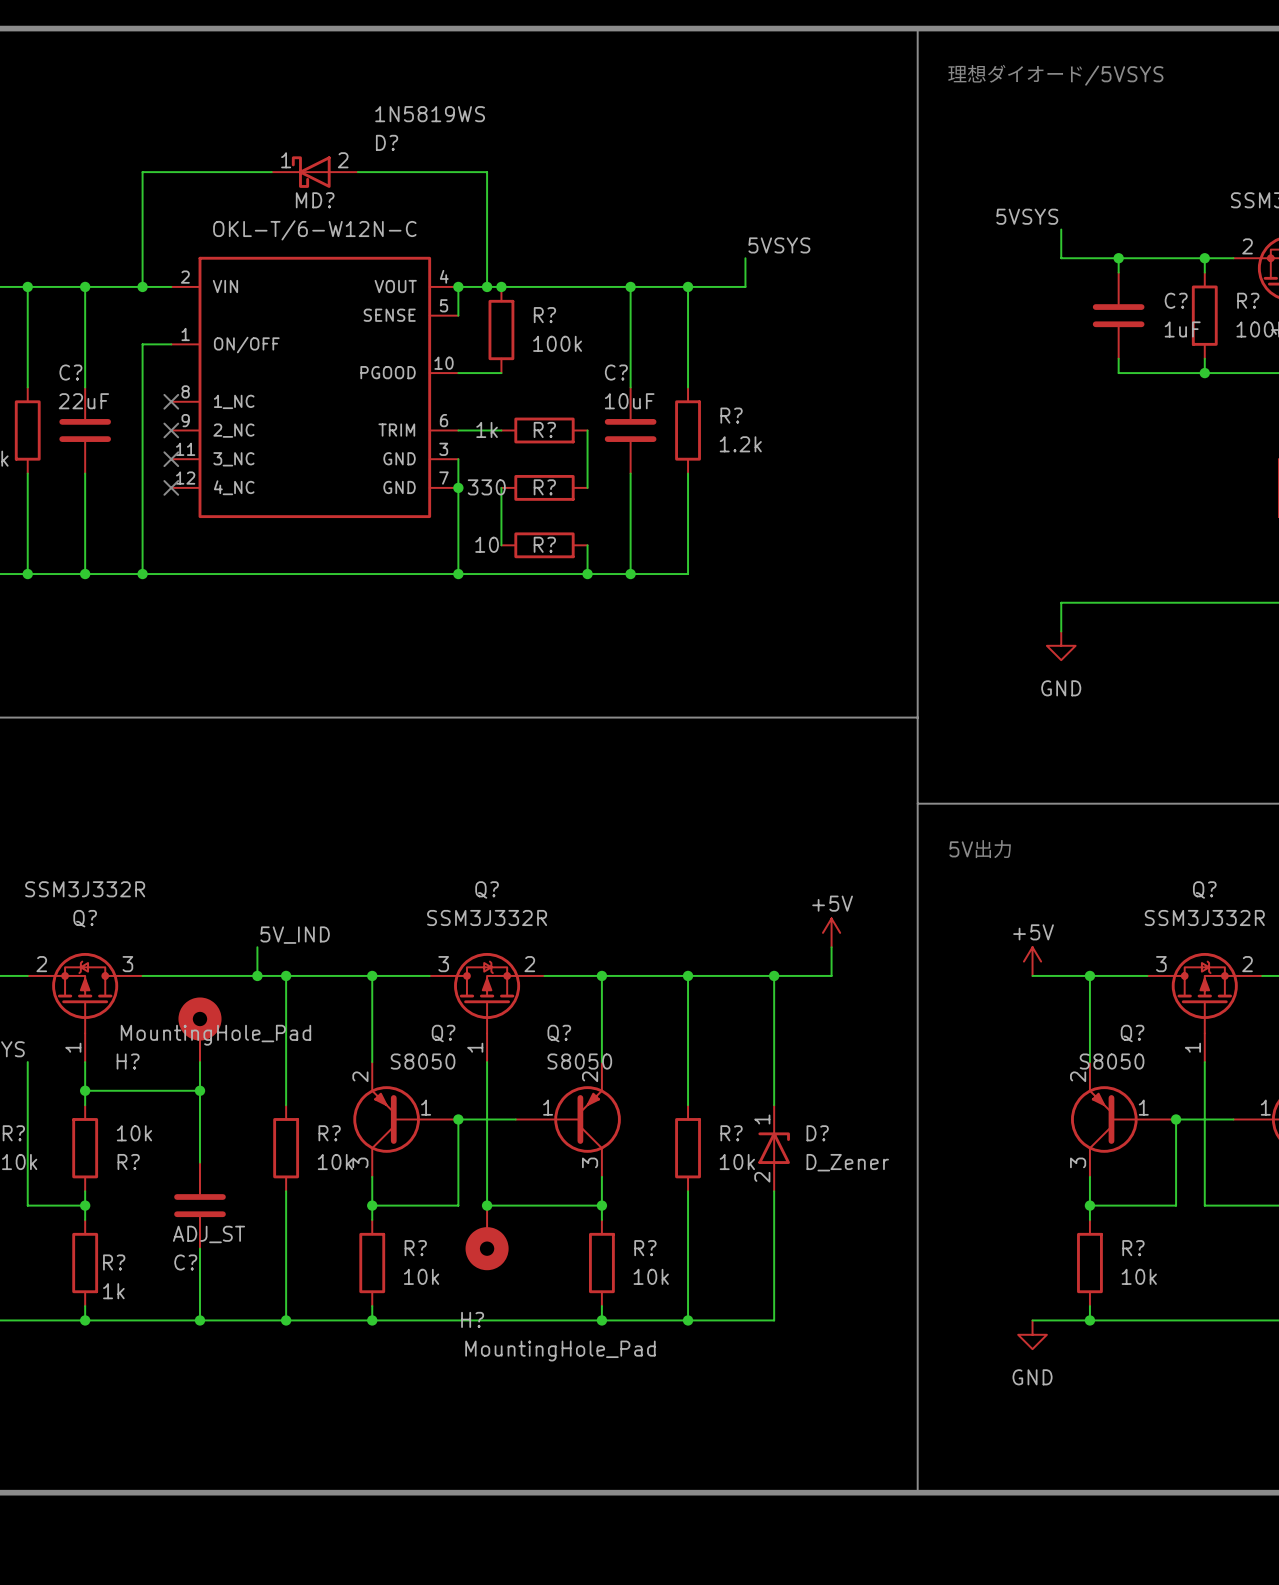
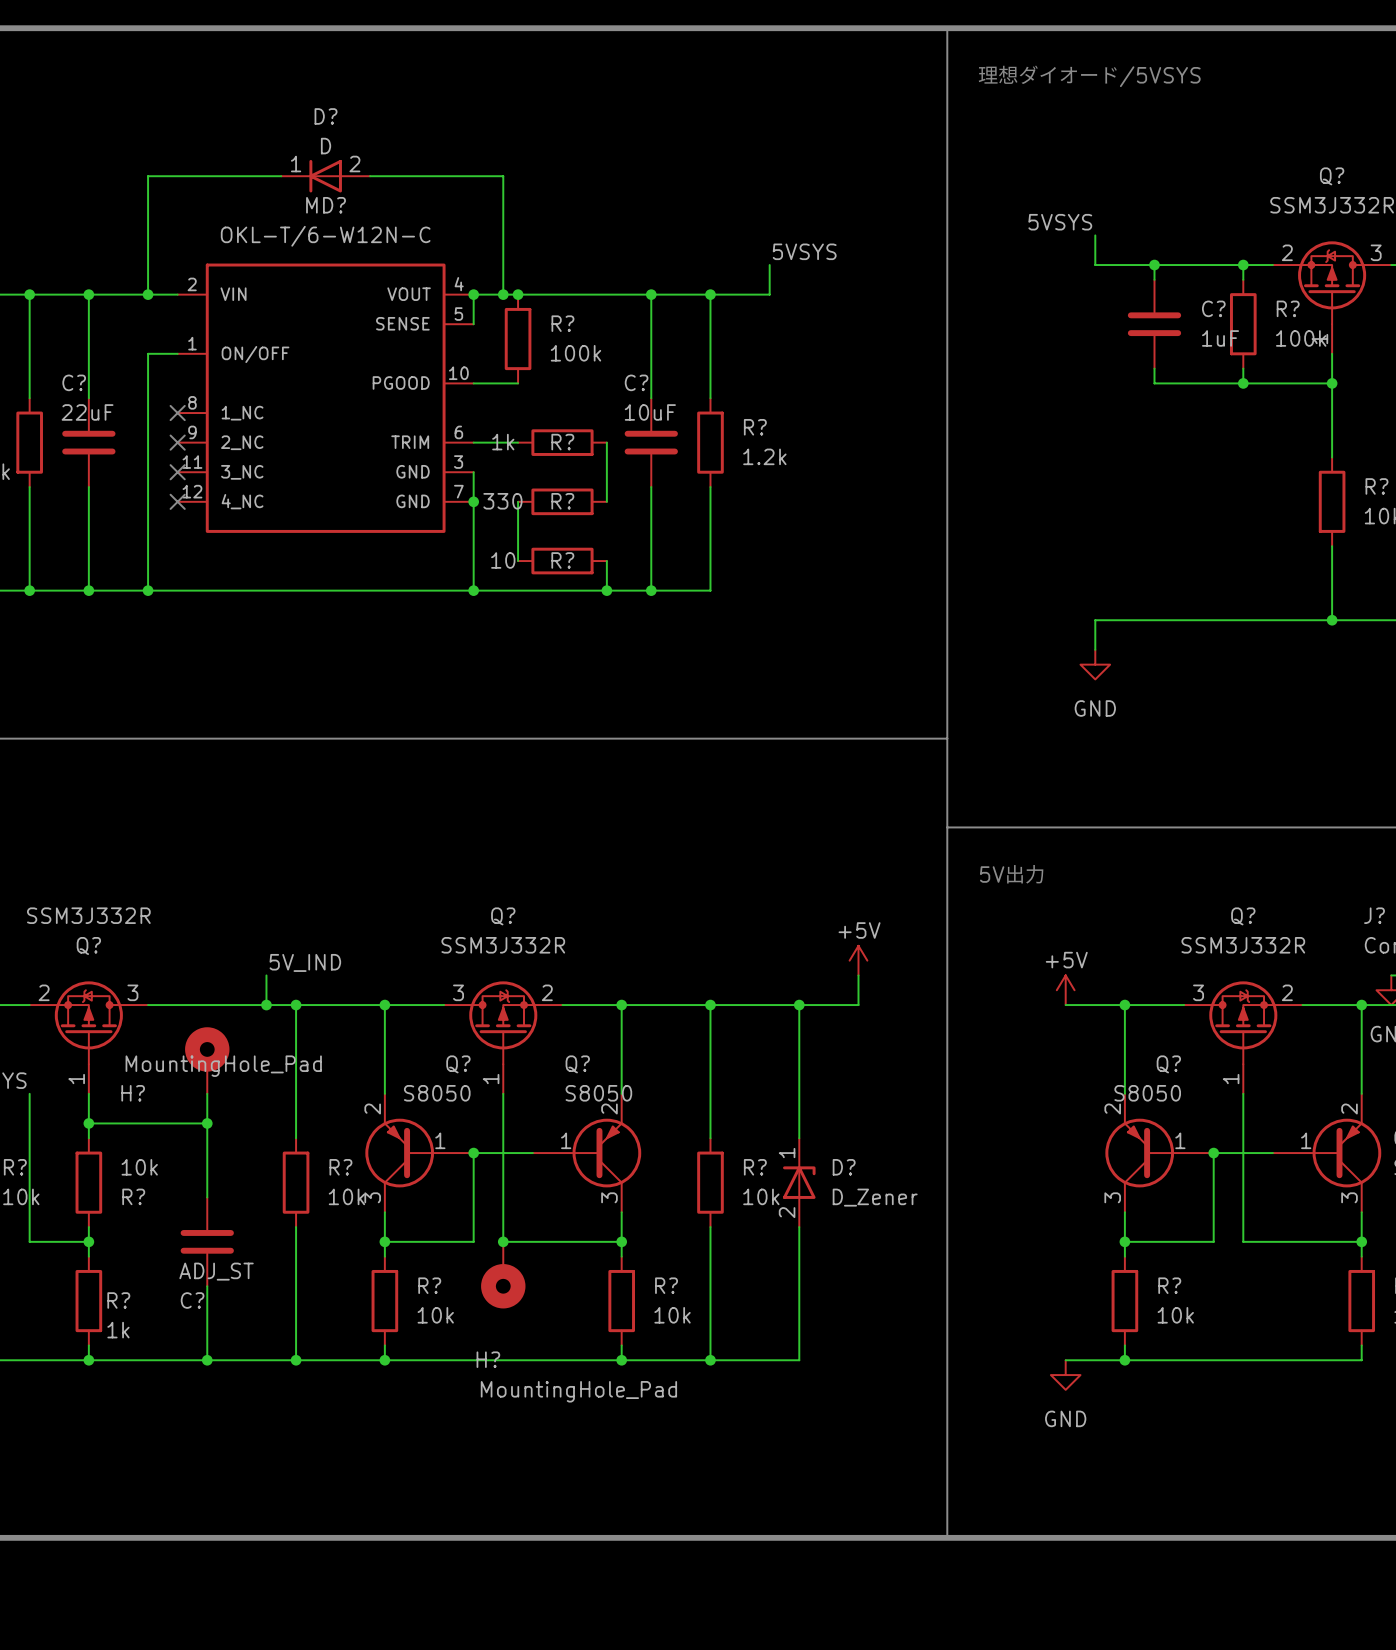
D? value: 1N5819WS (430, 114) -> D (326, 146)
D? name position: D? (387, 142) -> D? (326, 116)
D? symbol: [271, 156, 358, 188] -> [281, 159, 371, 193]

